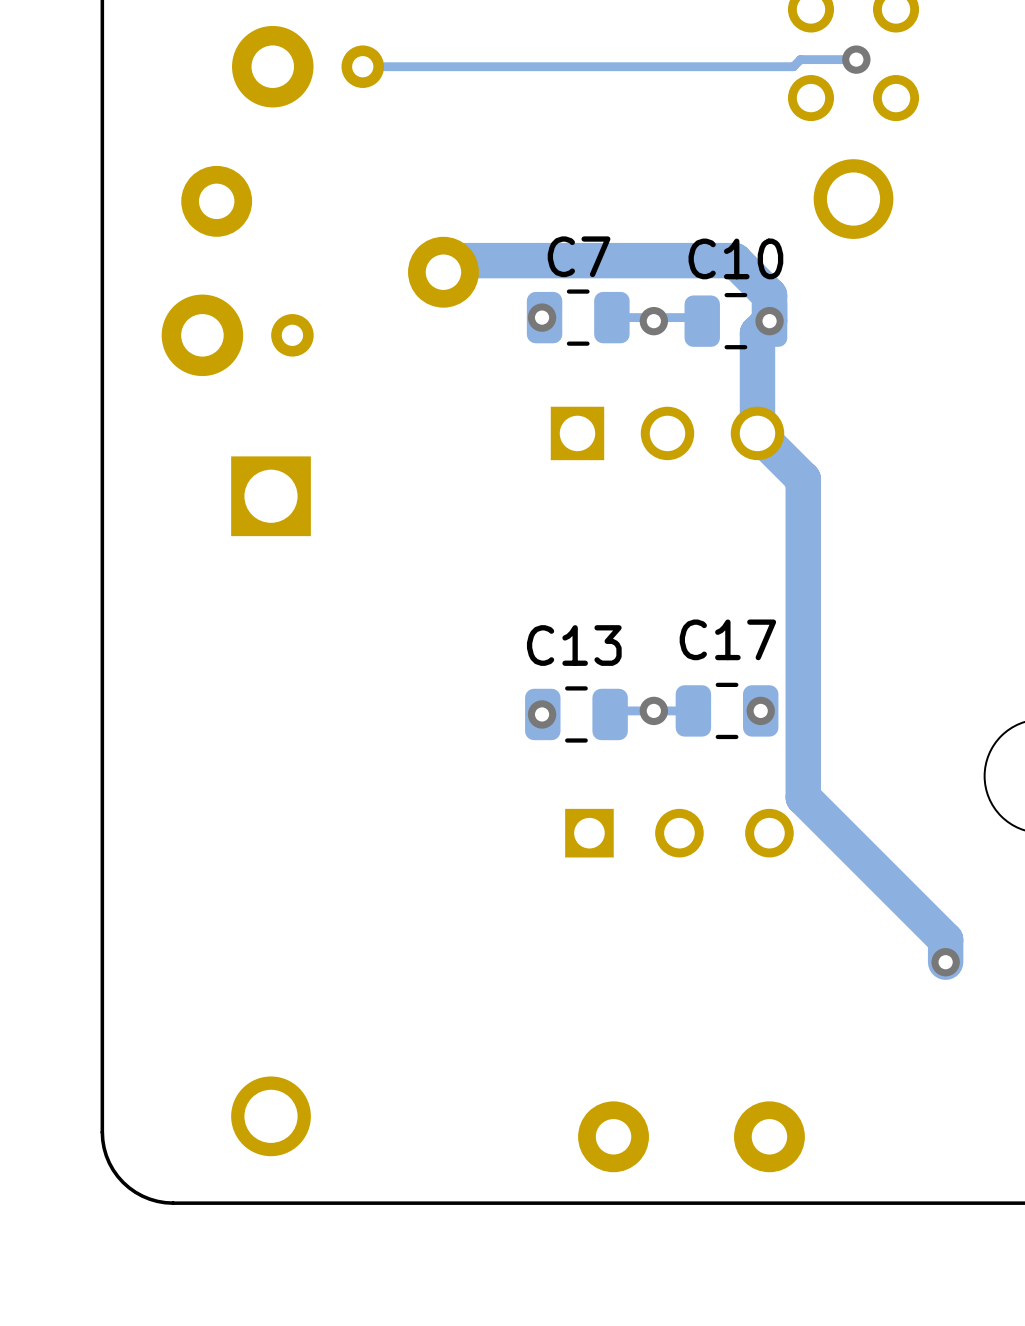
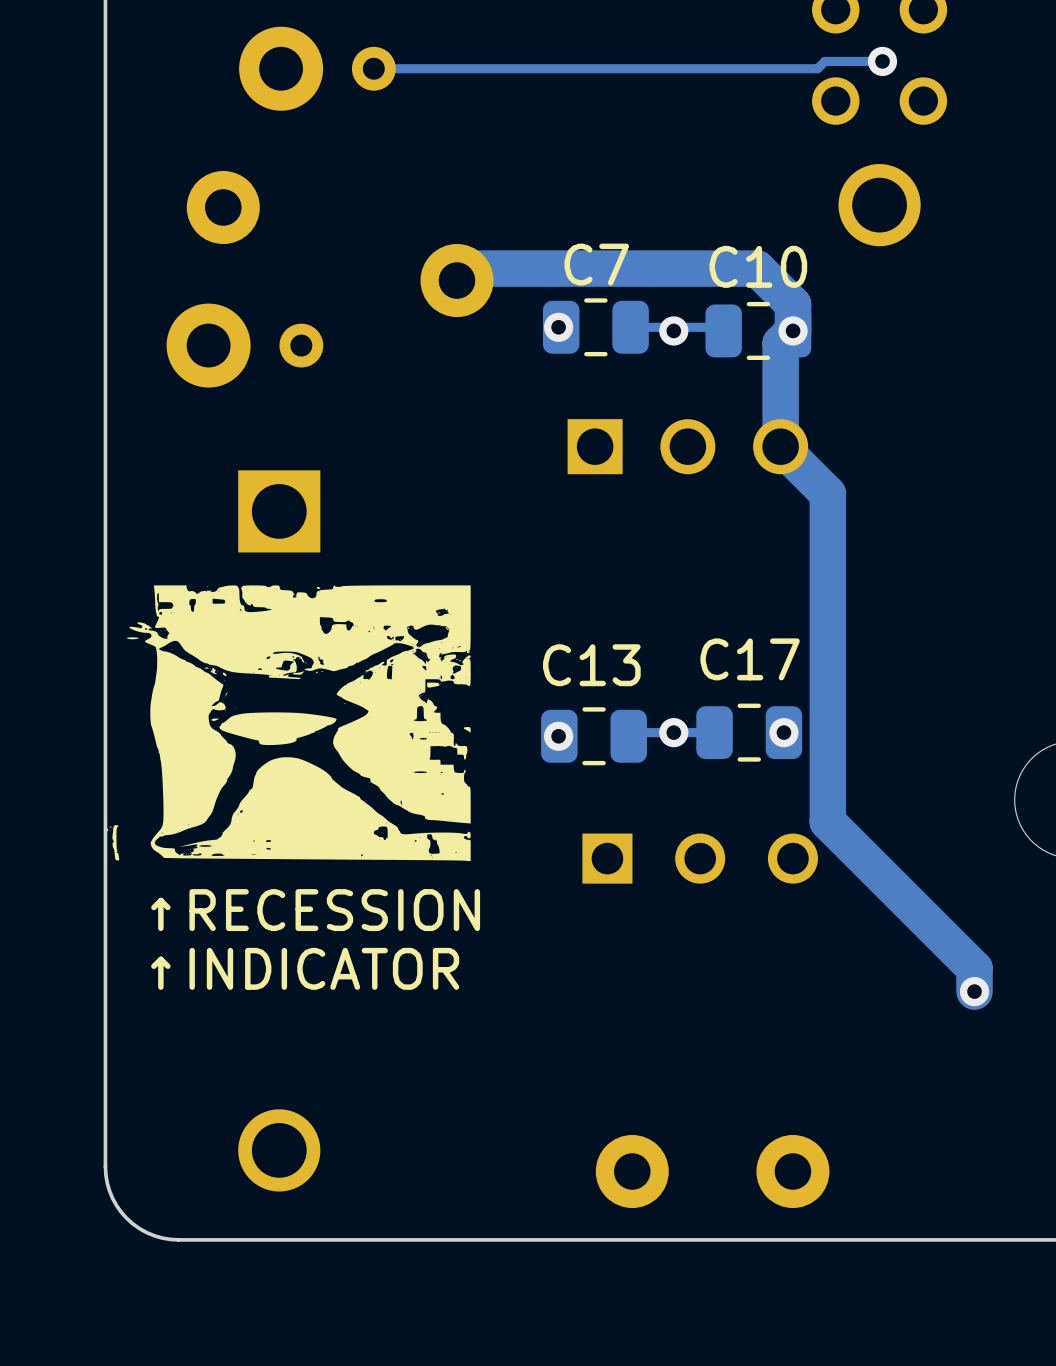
drawing: none -> [105, 585, 471, 862]
text: none -> ↑RECESSION (315, 910)
text: none -> ↑INDICATOR (305, 968)

